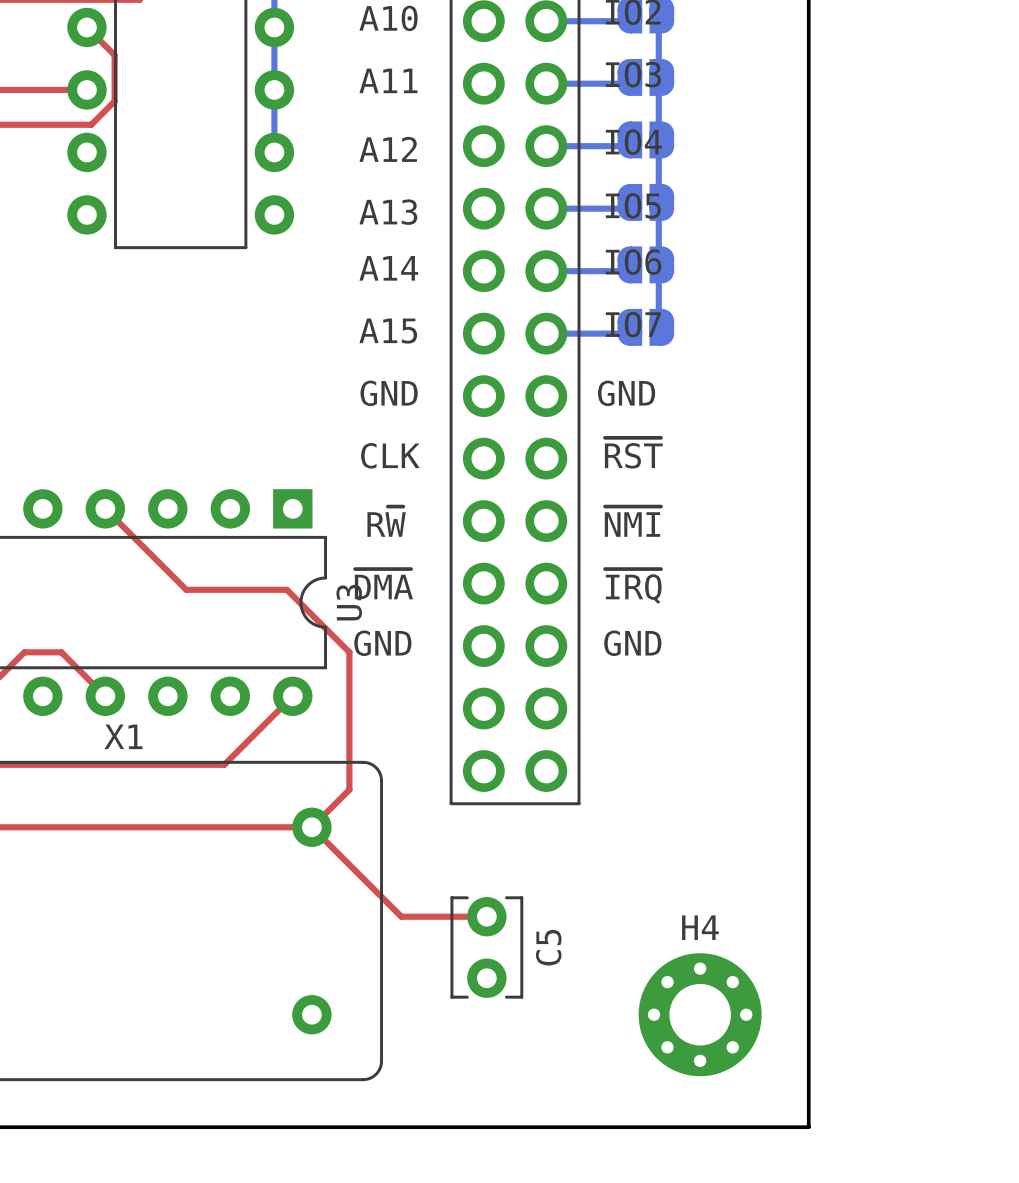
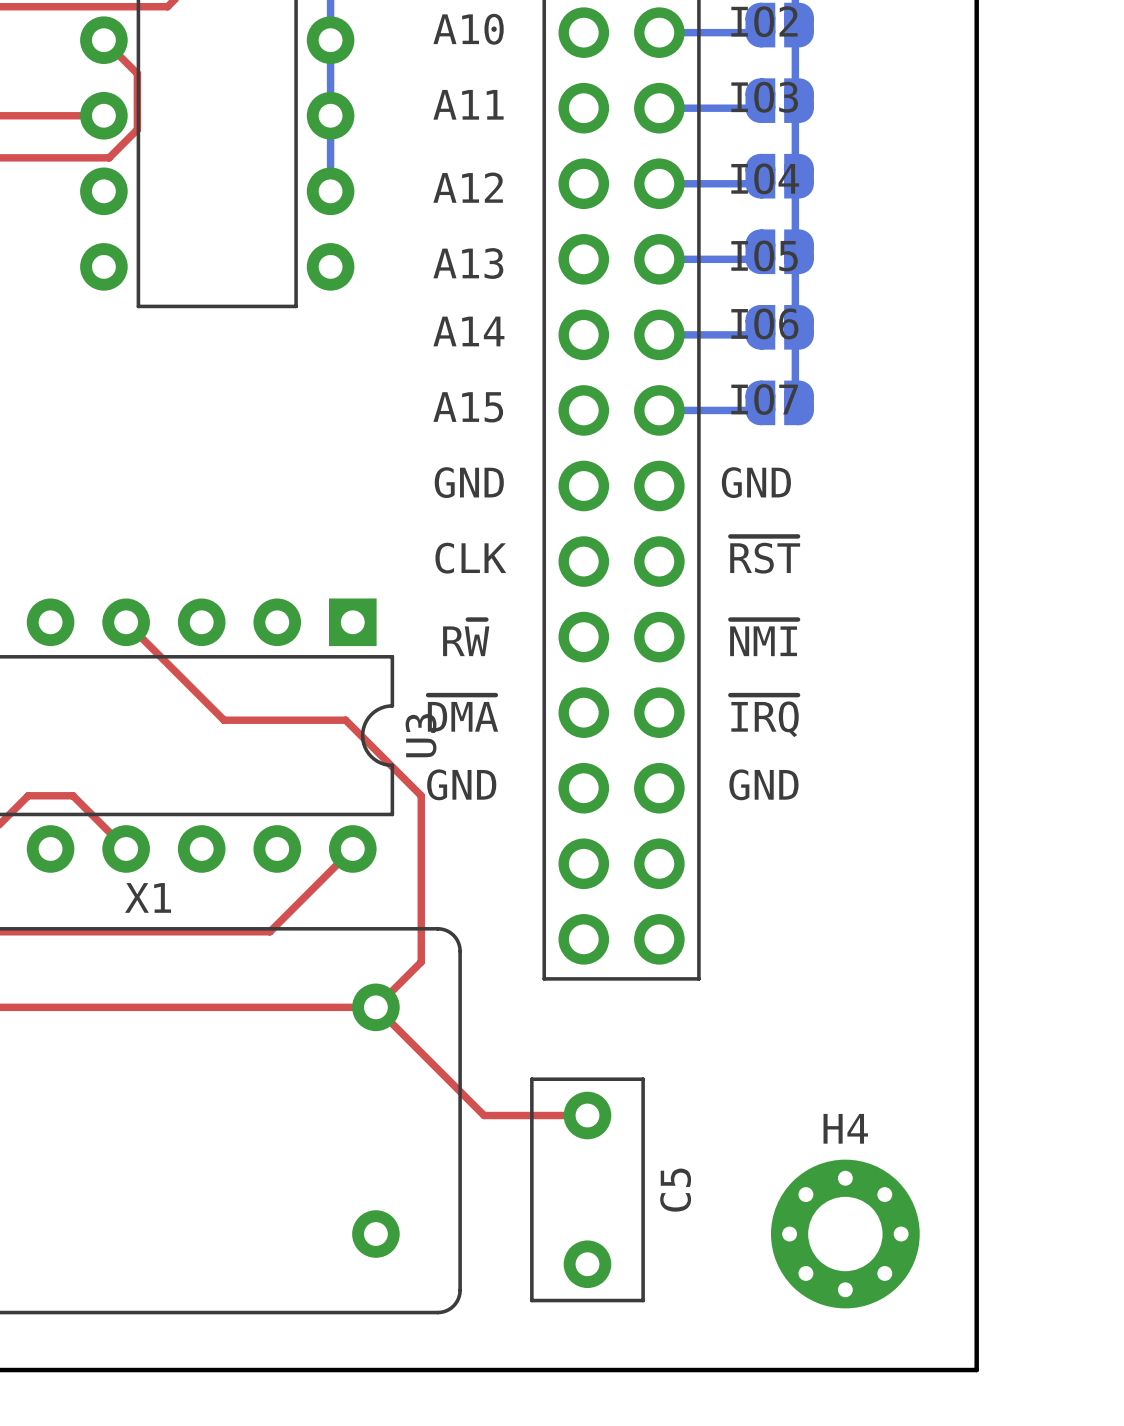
C5 footprint: [450, 896, 524, 999] -> [530, 1077, 645, 1303]

